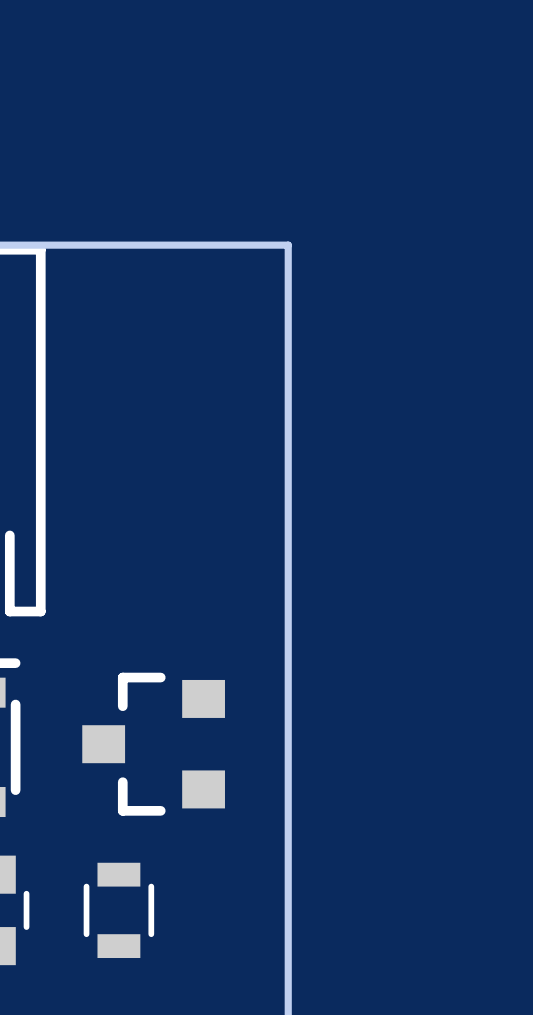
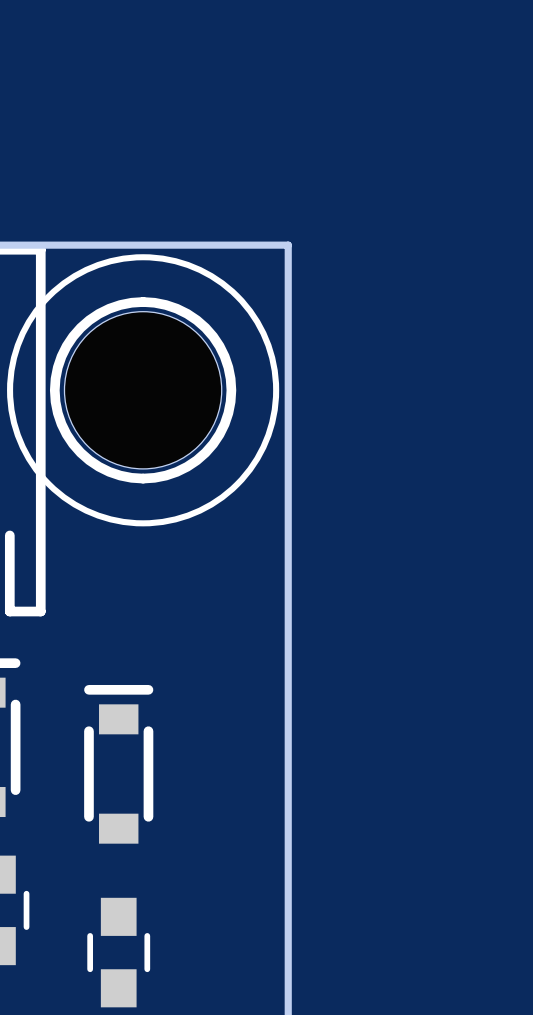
part: none -> (143, 390)
part footprint: [82, 672, 225, 816] -> [84, 684, 154, 844]
part footprint: [83, 862, 155, 959] -> [87, 897, 151, 1008]

